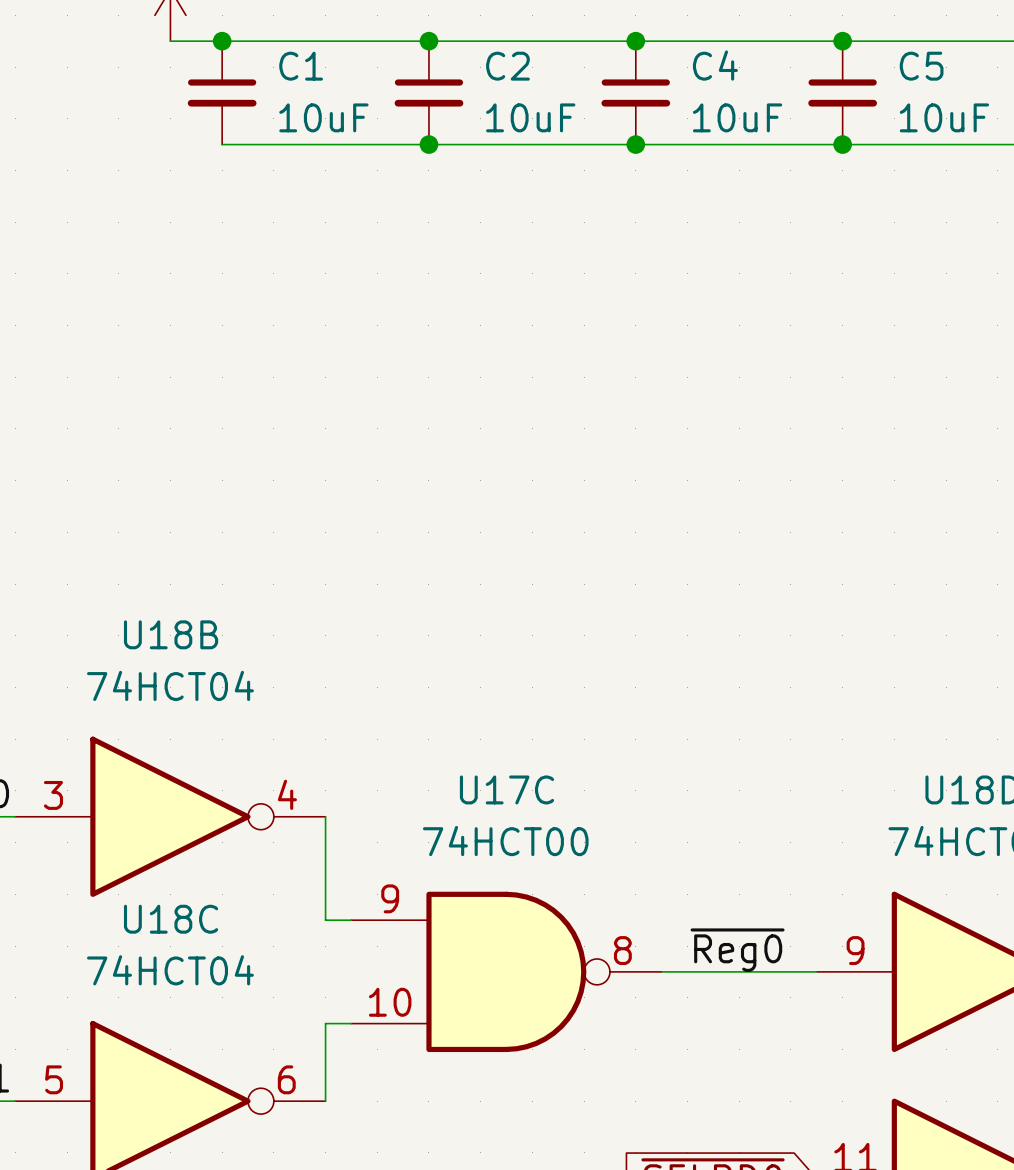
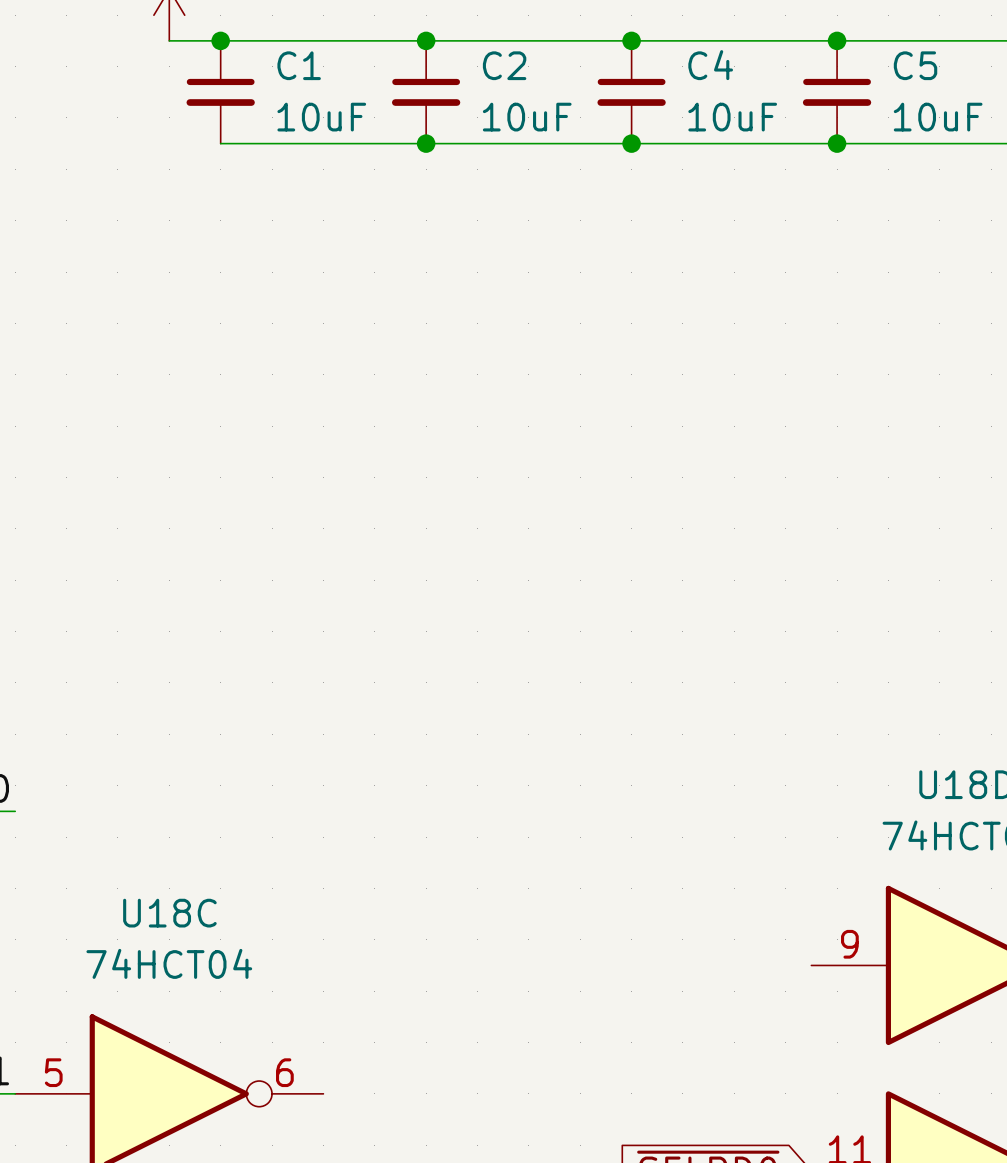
U18B: 74HCT04 (170, 816) -> none
wire: (325, 816) (325, 920) (351, 920) -> none
label: ~{Reg0} (737, 950) -> none
U17C: 74HCT00 (506, 971) -> none
wire: (661, 971) (816, 971) -> none
wire: (351, 1023) (325, 1023) (325, 1101) -> none

